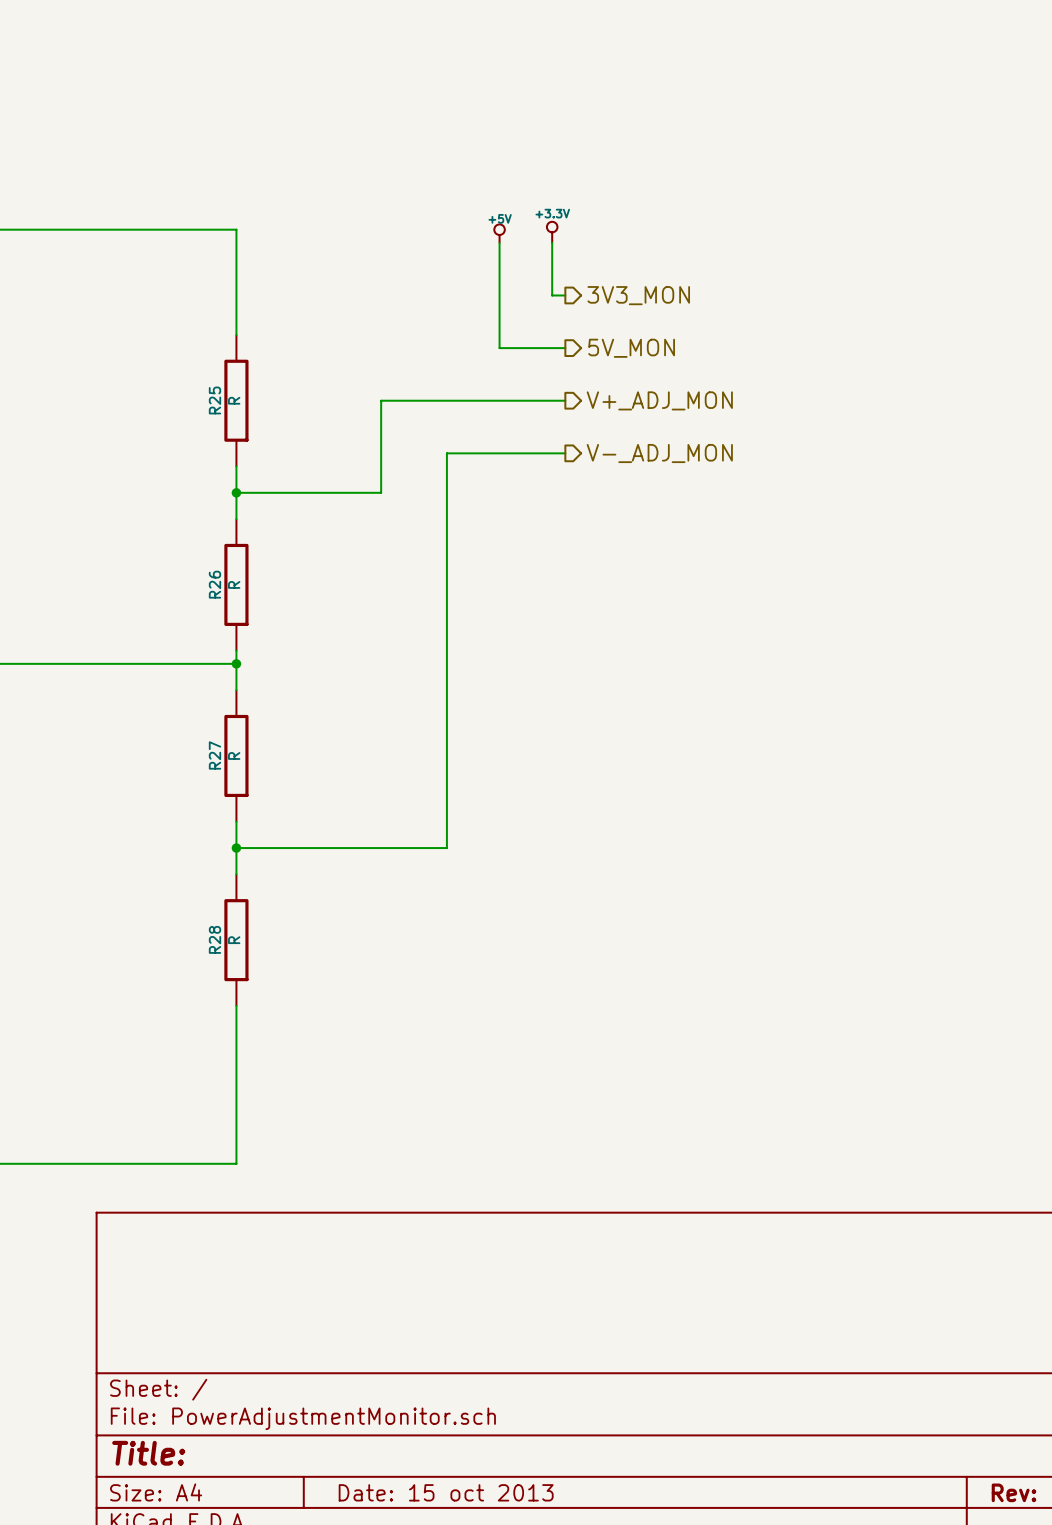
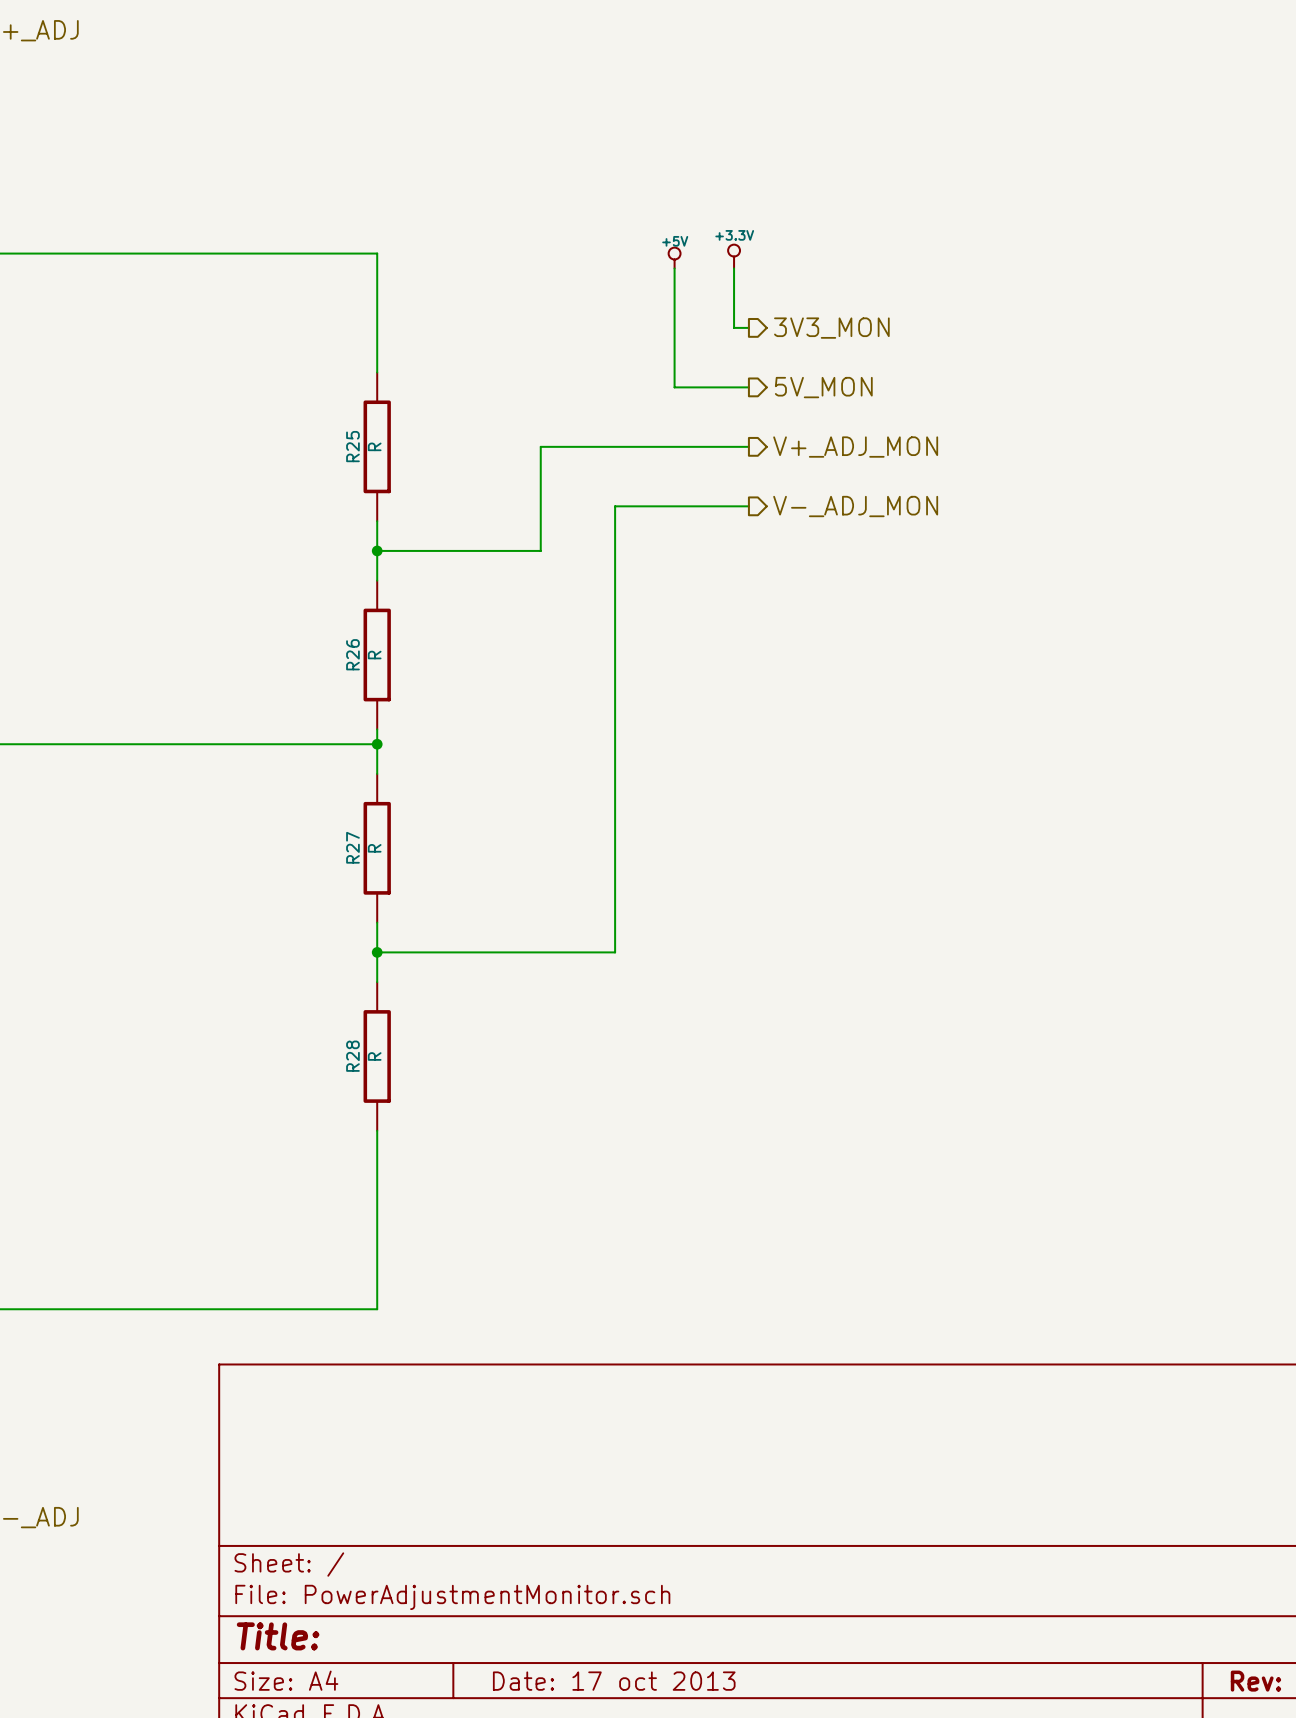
title block: Date: 15 oct 2013 (446, 1492) -> Date: 17 oct 2013 (614, 1681)

